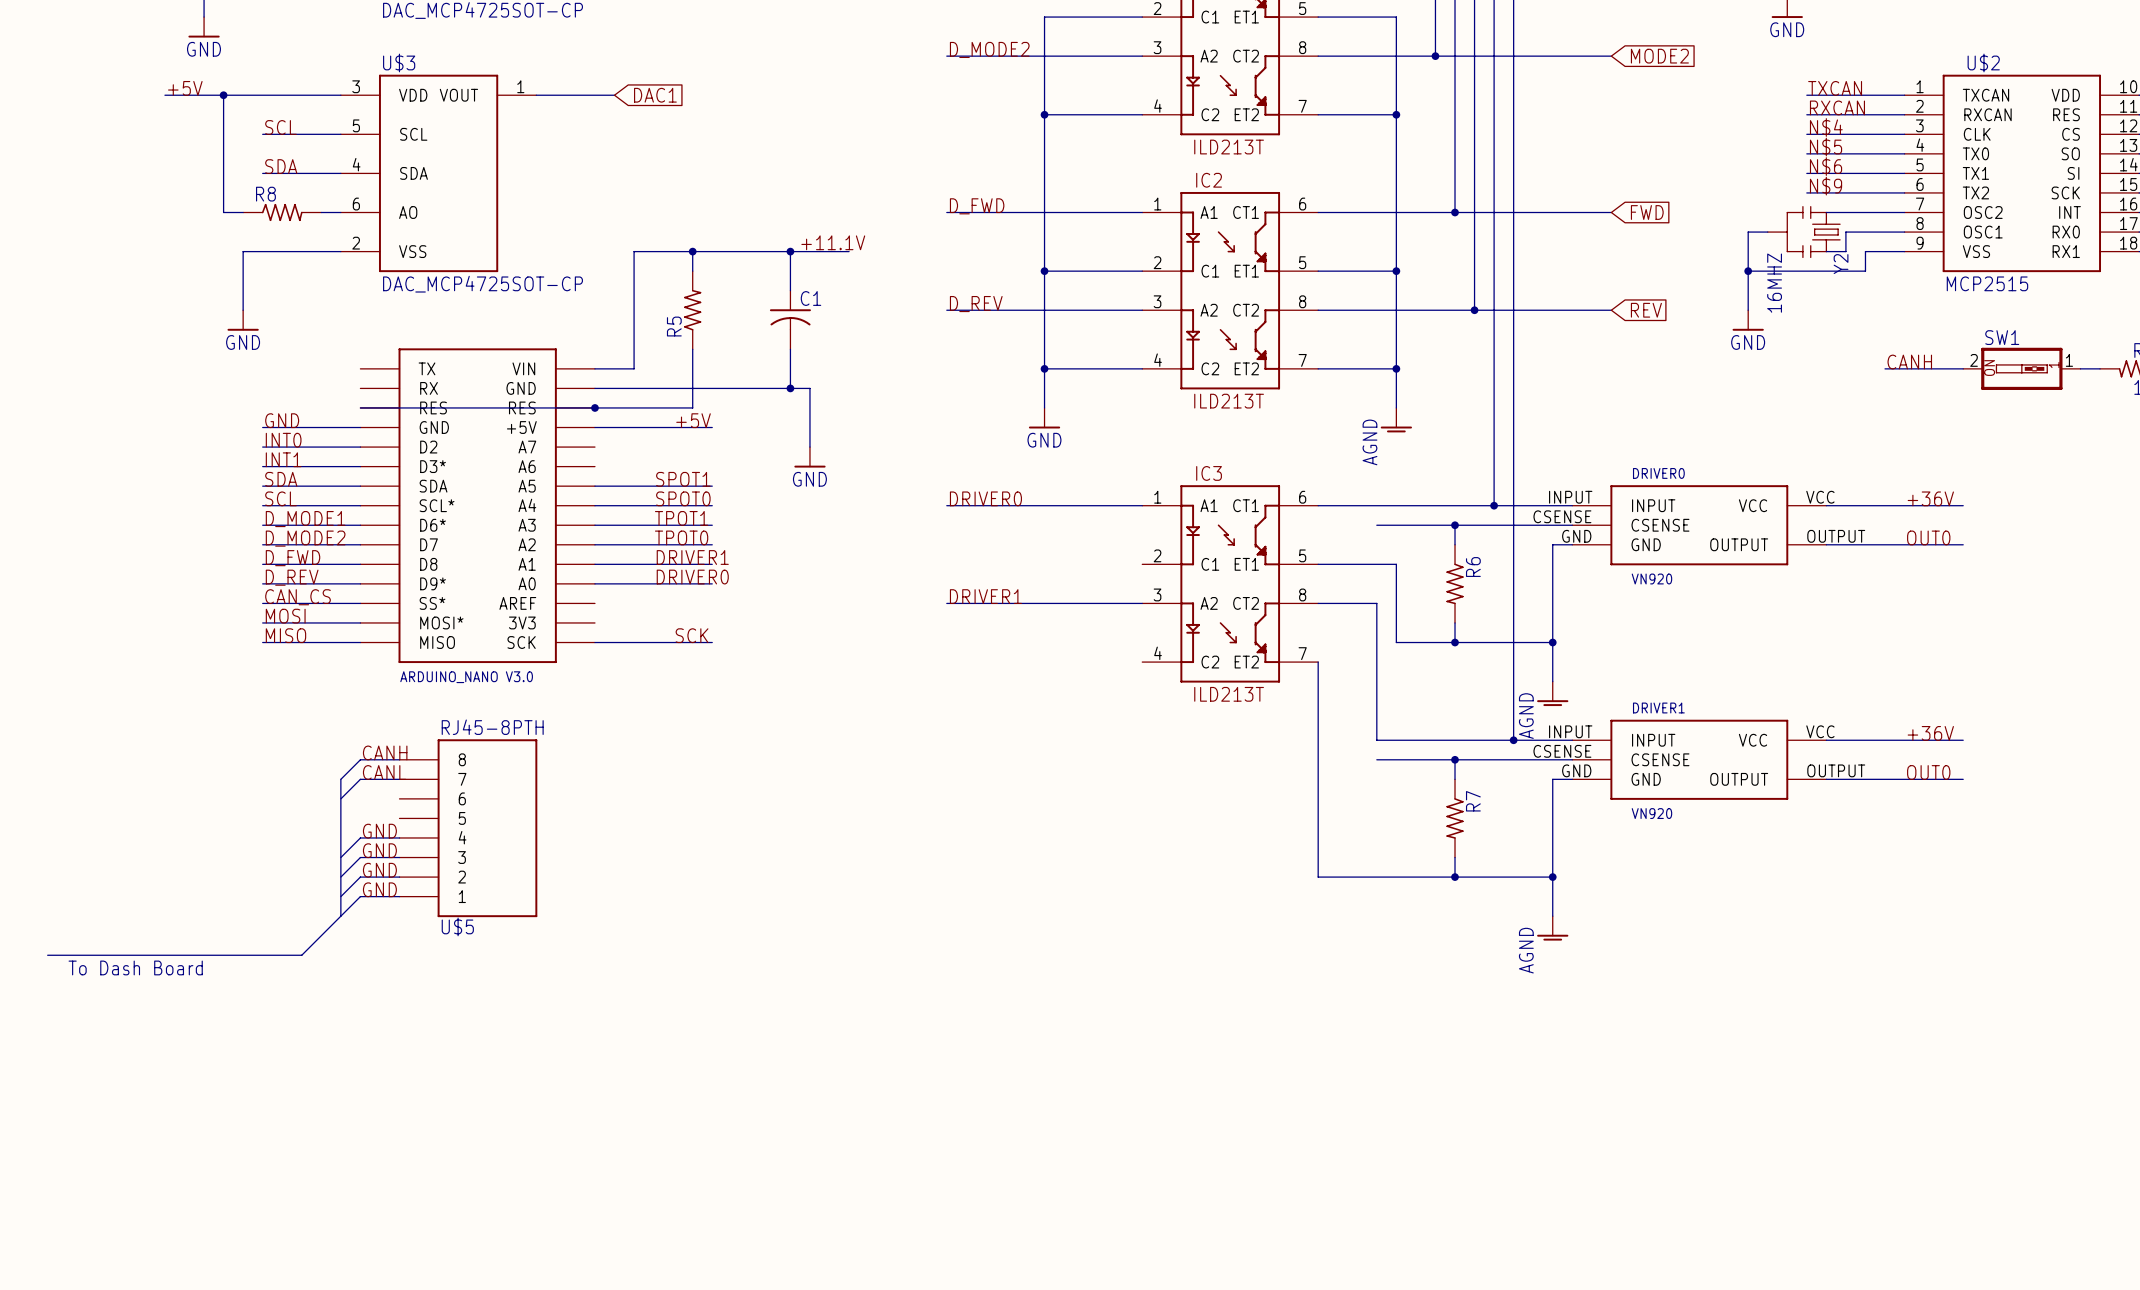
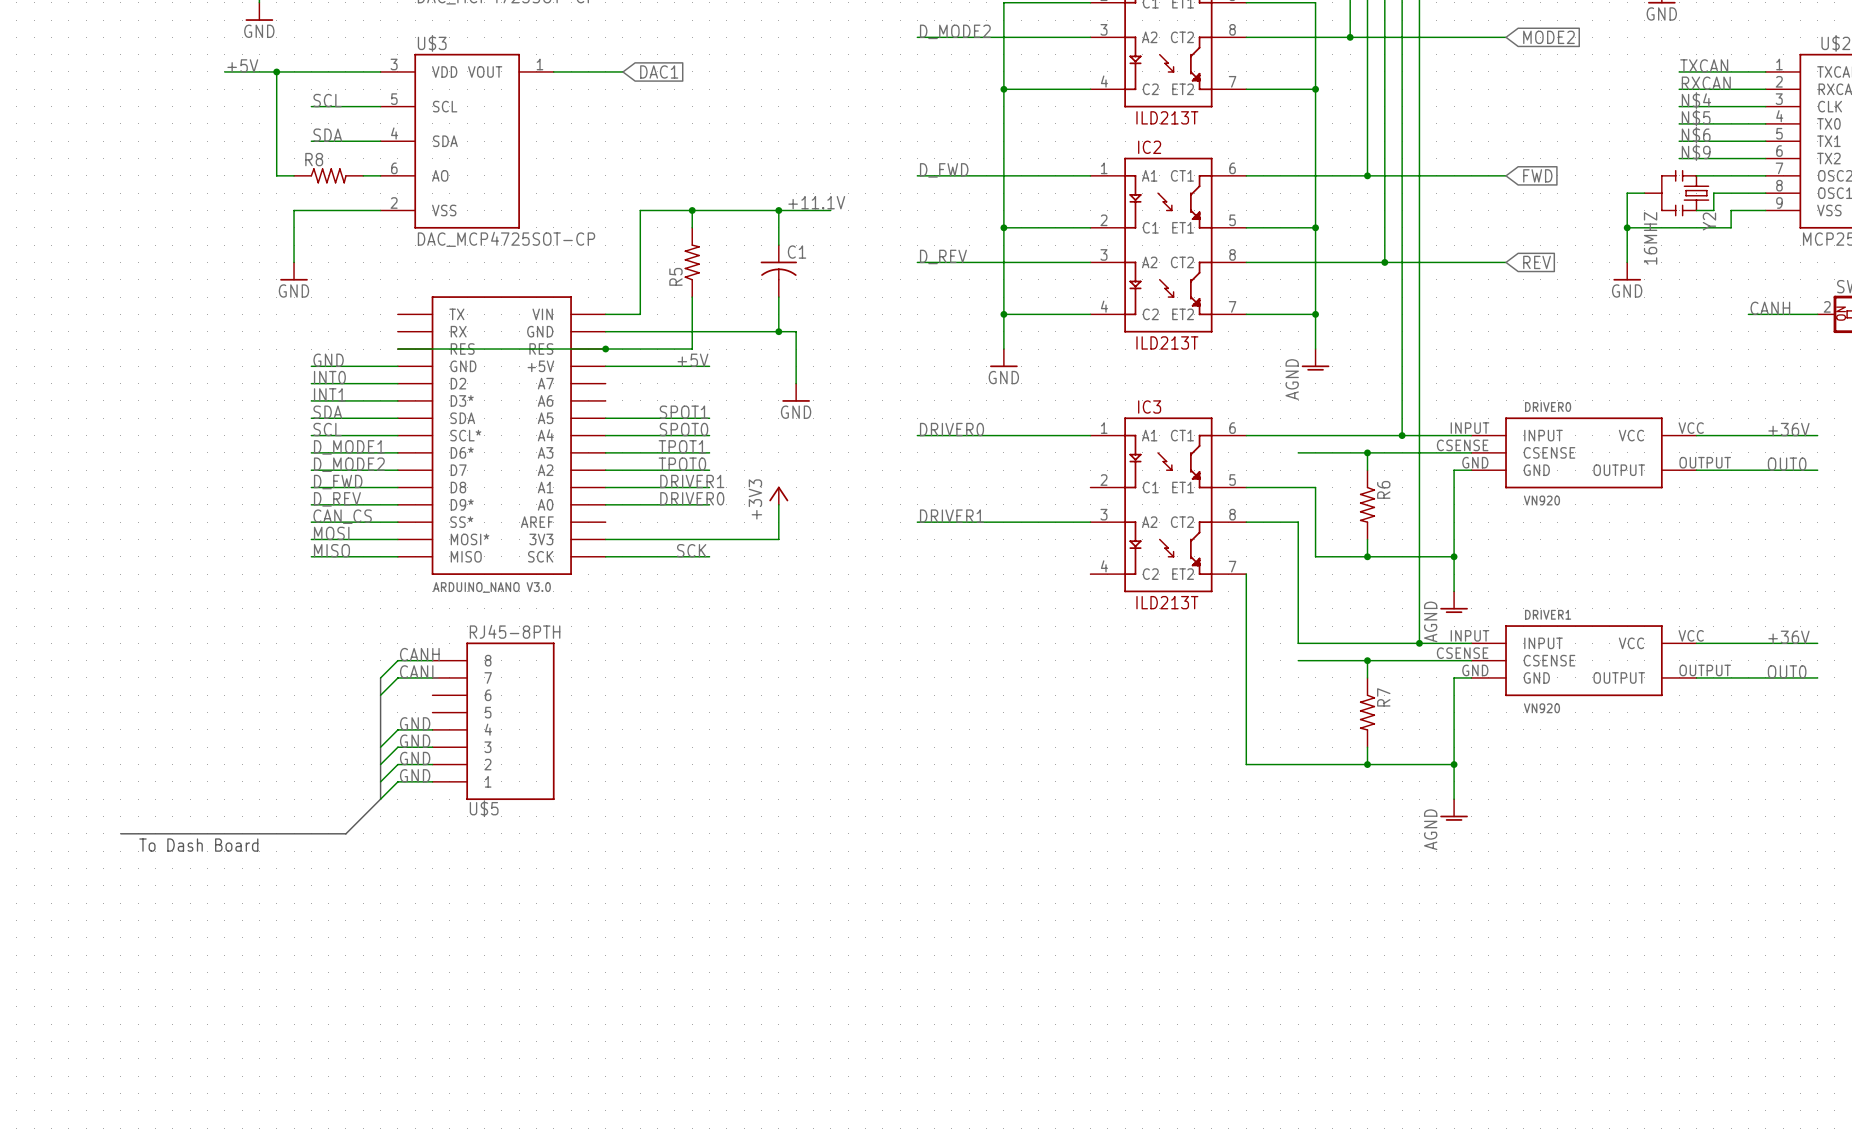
power symbol: none -> +3V3 (778, 495)
wire: none -> (778, 504) (778, 539) (605, 539)

